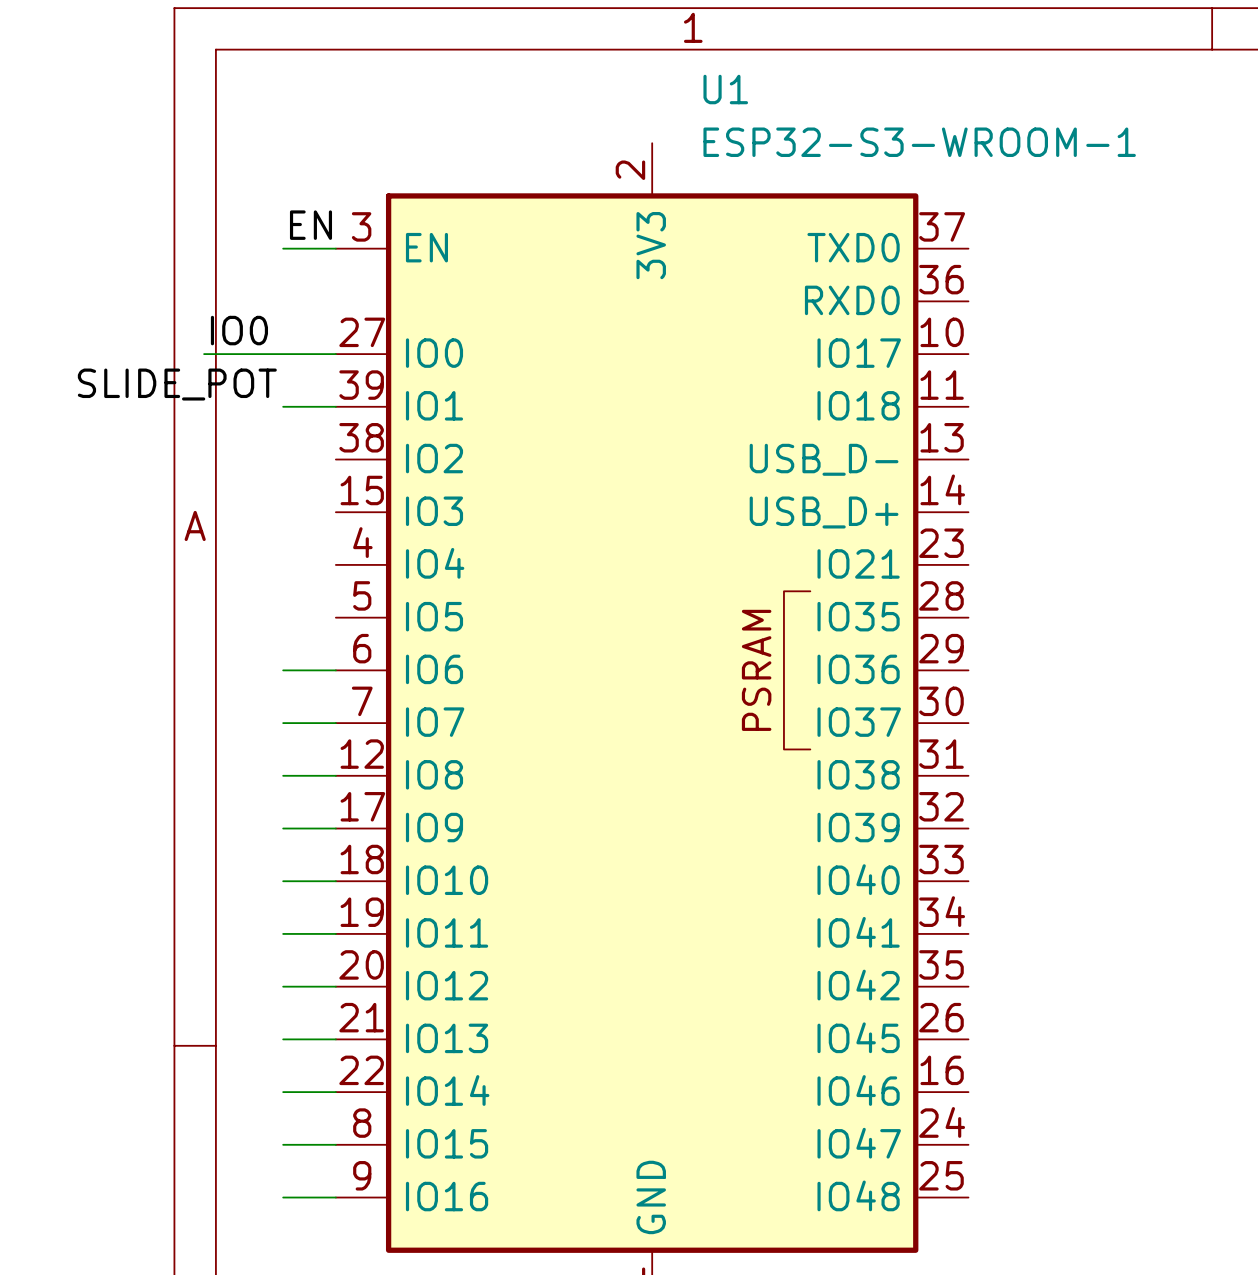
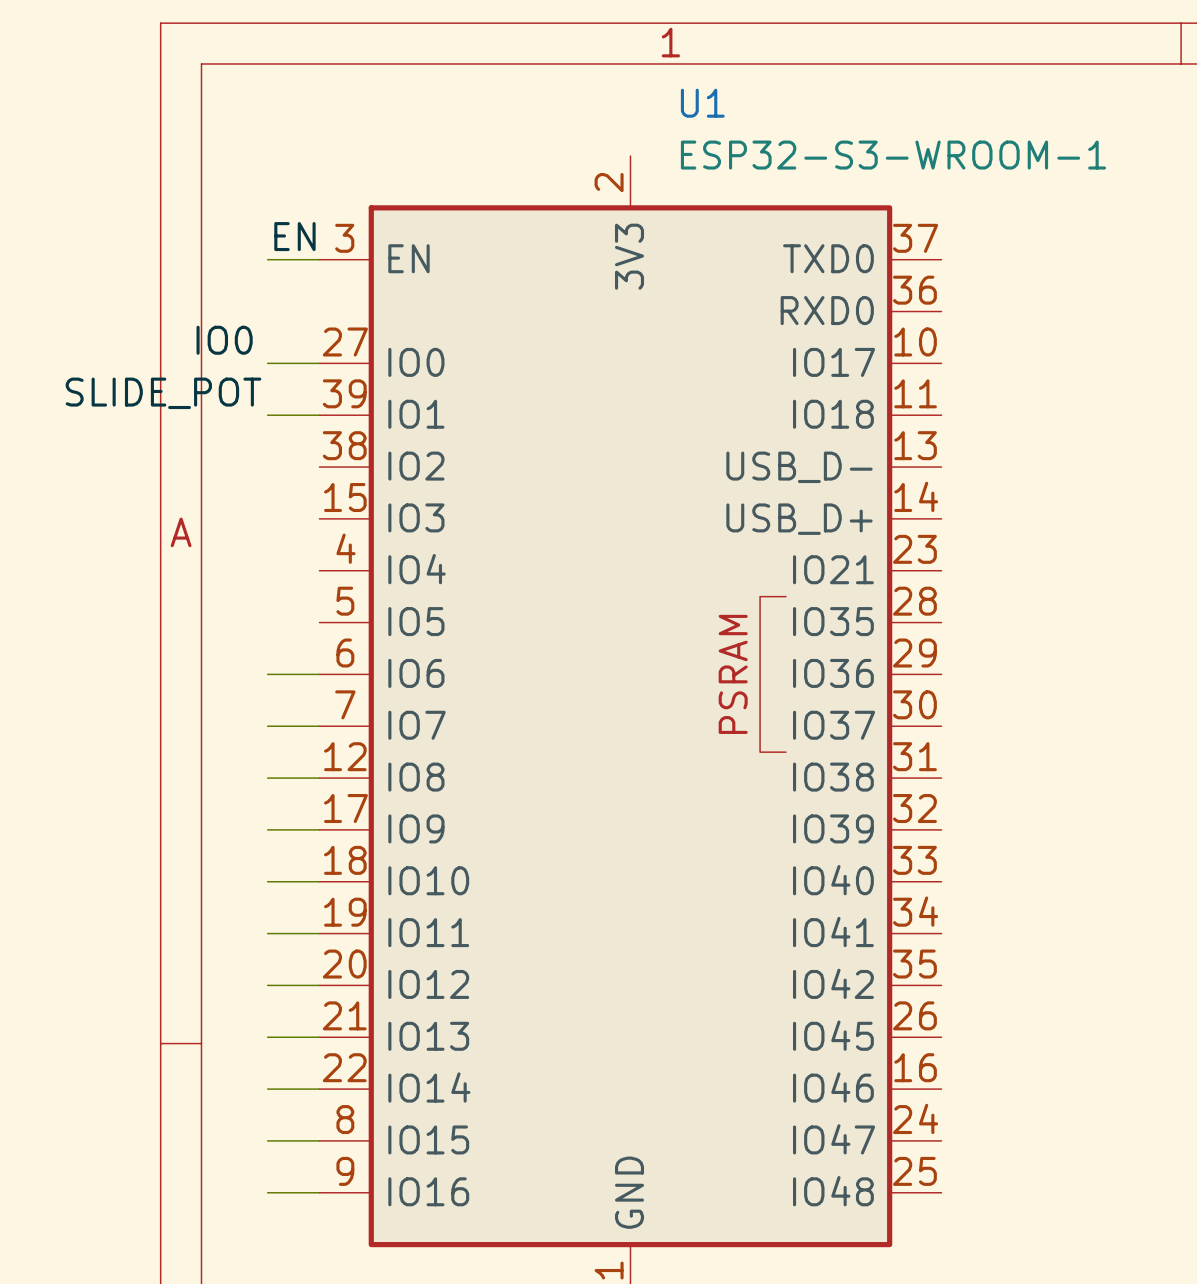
wire: (204, 354) (283, 354) -> none

